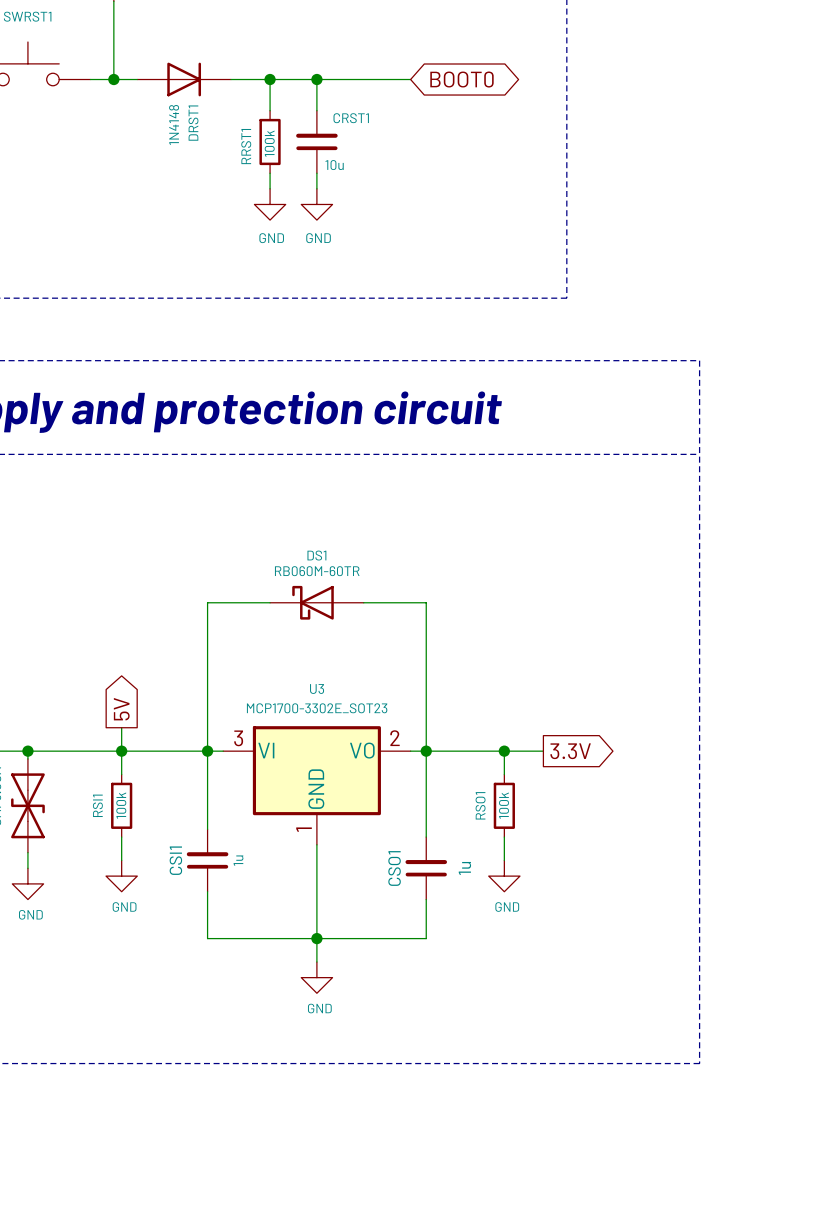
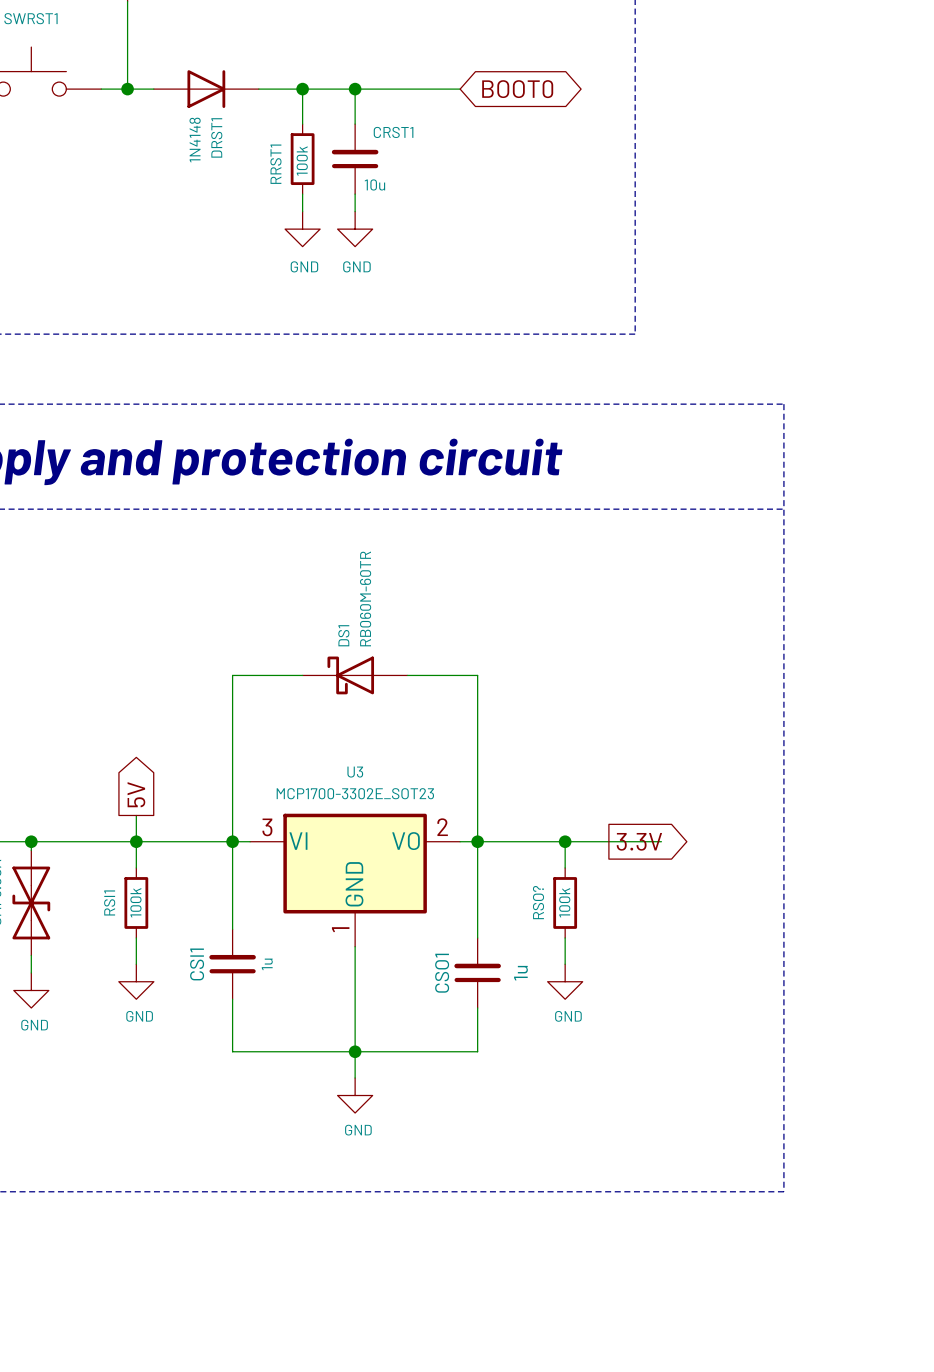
DS1 name rotation: 0° (316, 555) -> 90° counterclockwise (343, 635)
DS1 value rotation: 0° (317, 571) -> 90° counterclockwise (365, 598)
wire: none -> (608, 841) (661, 841)
RSO1 name: RSO1 (480, 805) -> RSO? (538, 902)

